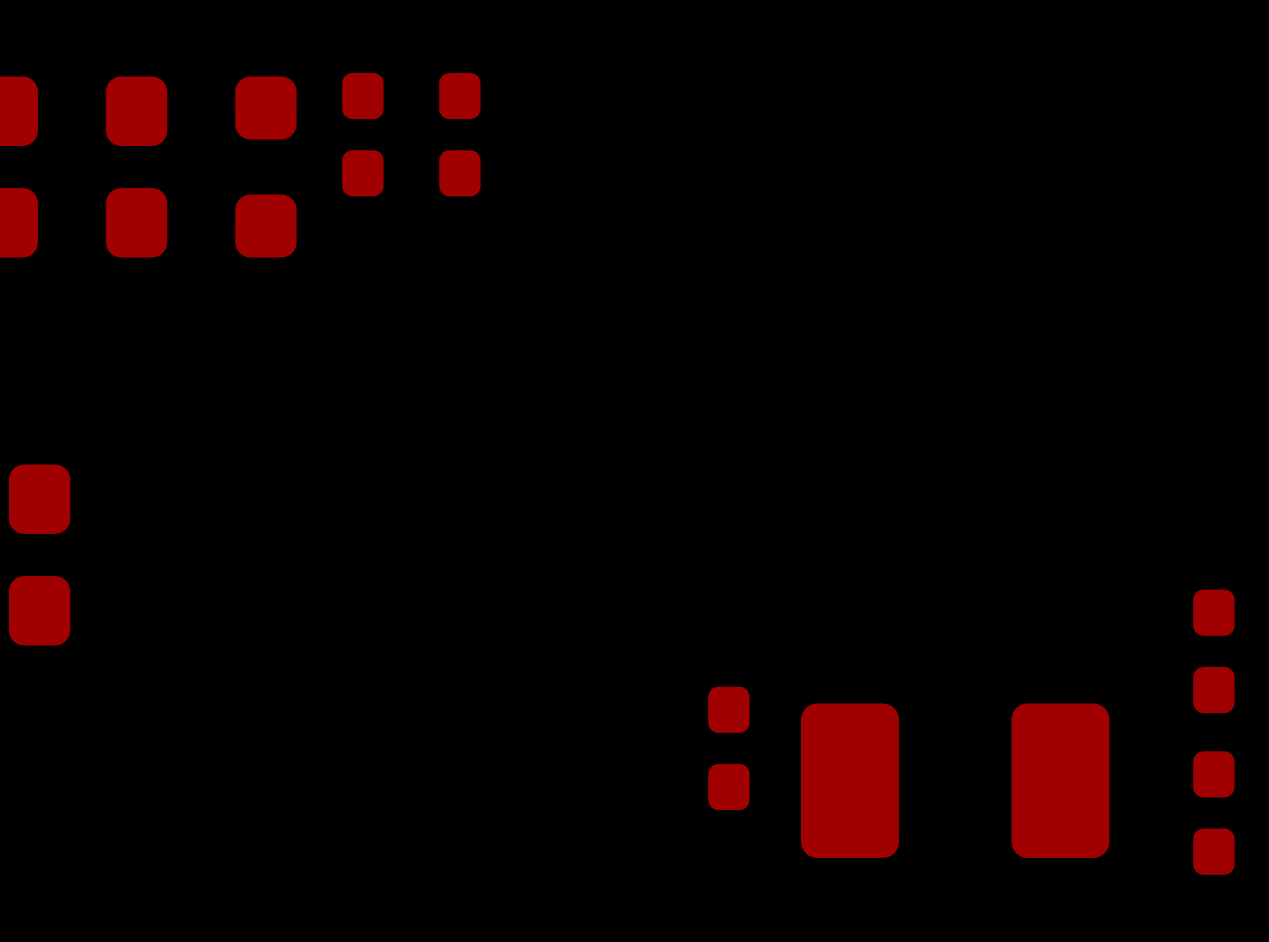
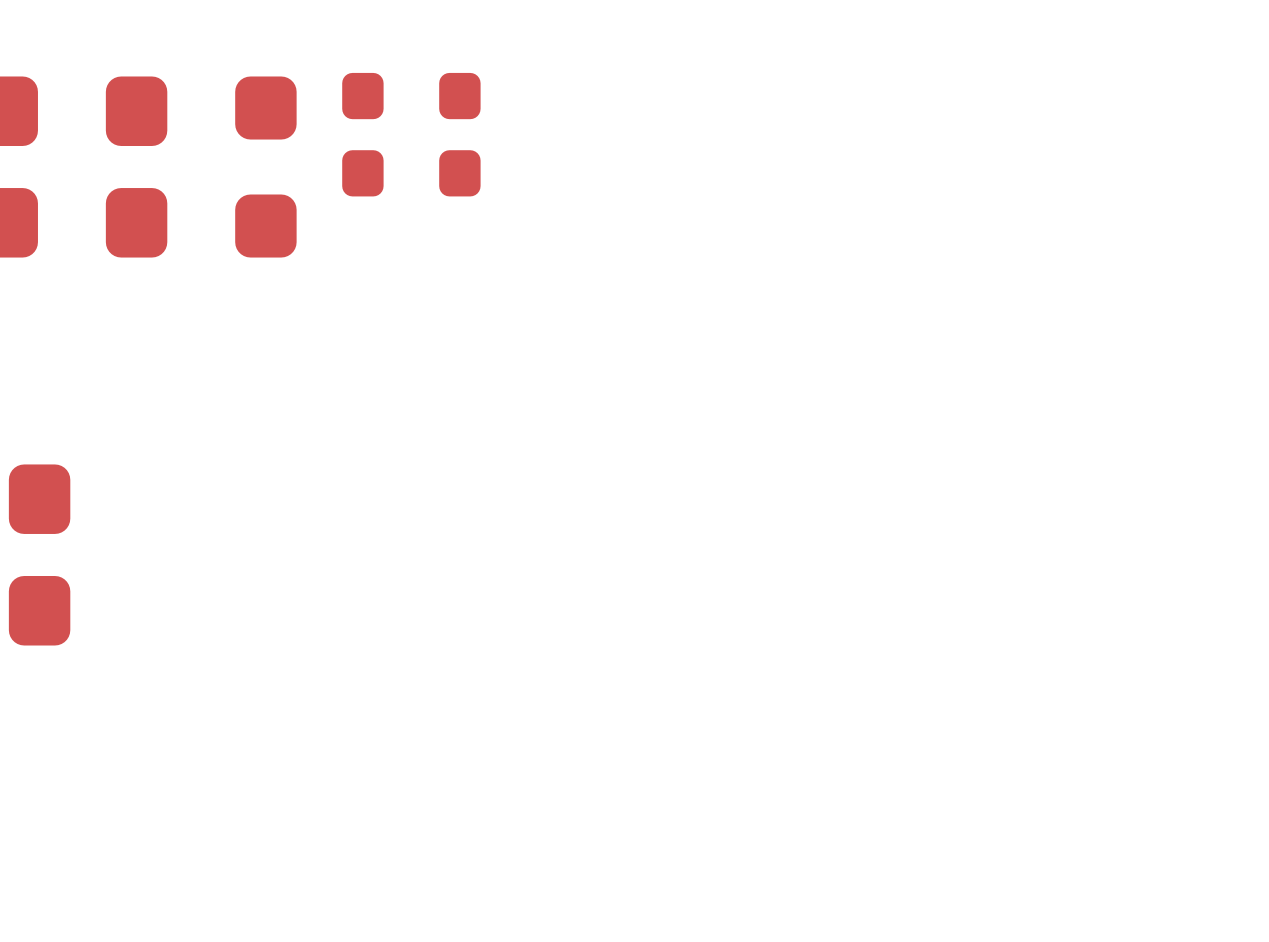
part: (1213, 651) -> none
part: (728, 748) -> none
part: (955, 780) -> none
part: (1213, 813) -> none

